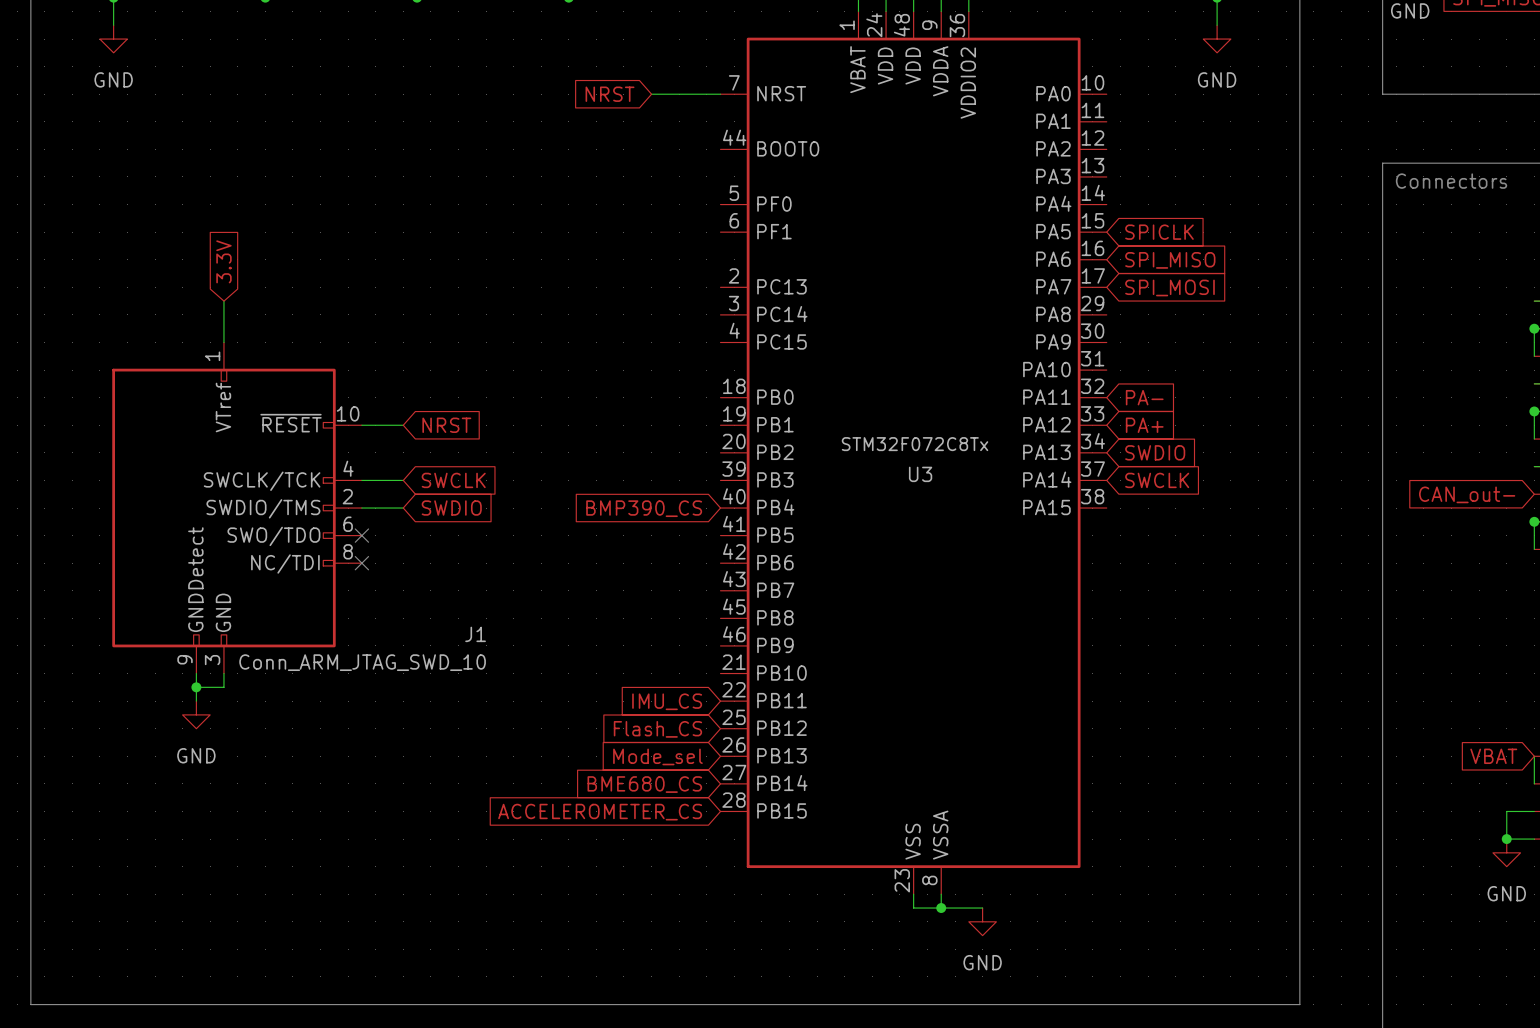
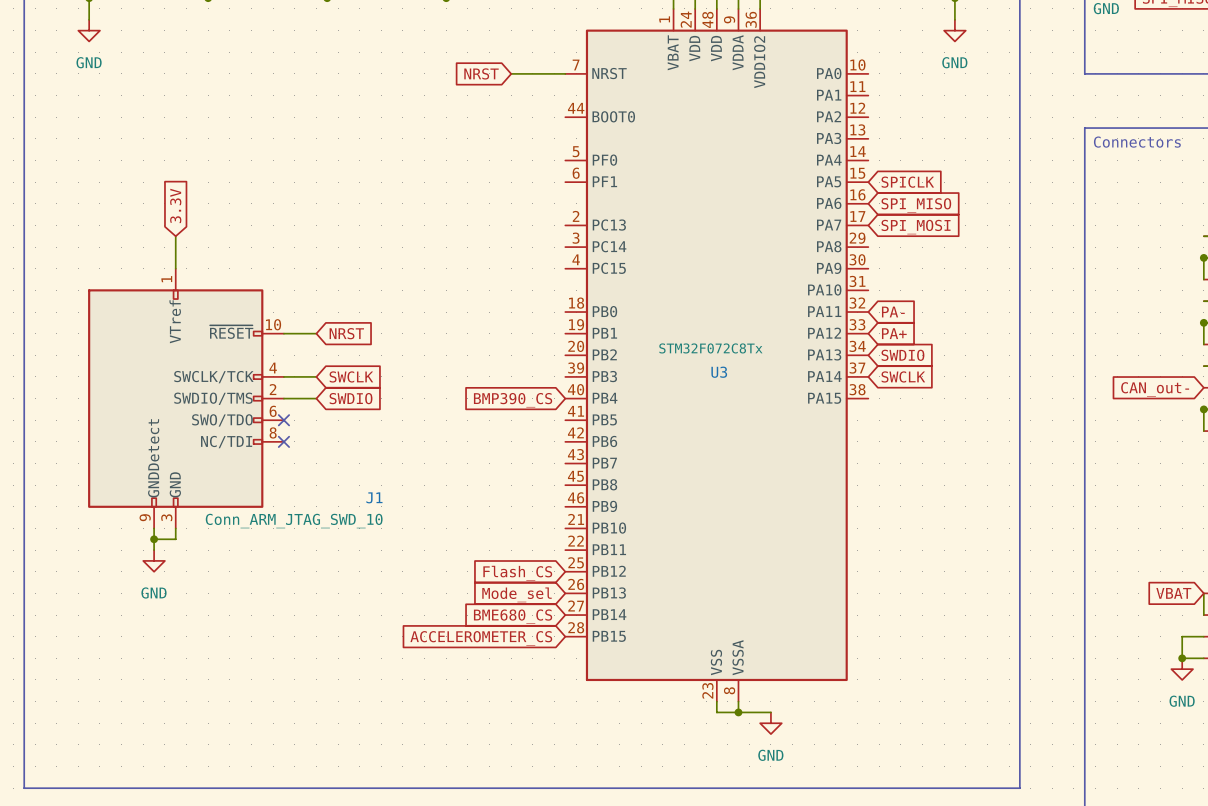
global label: IMU_CS (667, 701) -> none

